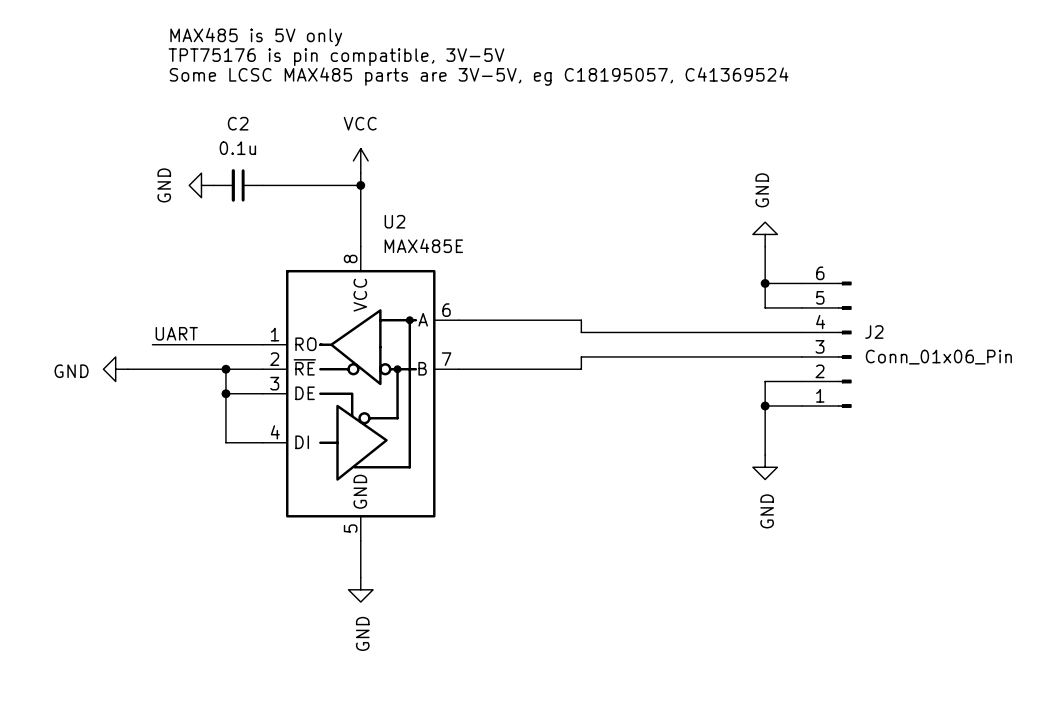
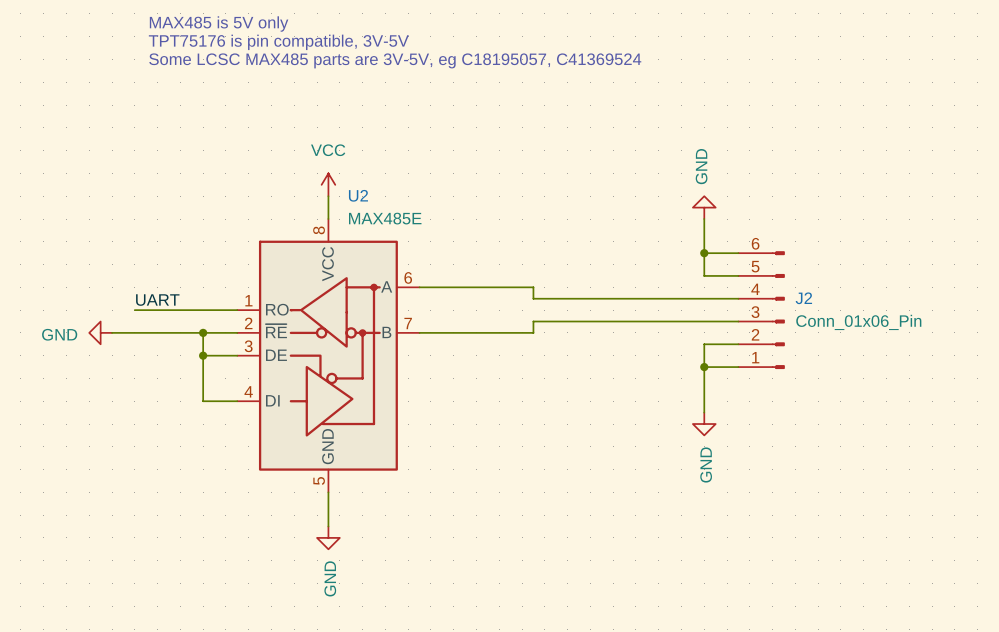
power symbol position: VCC (360, 160) -> VCC (328, 184)
power symbol: GND (201, 185) -> none
C2: 0.1u (238, 185) -> none
wire: (262, 185) (360, 185) -> none
junction: (360, 185) -> none

